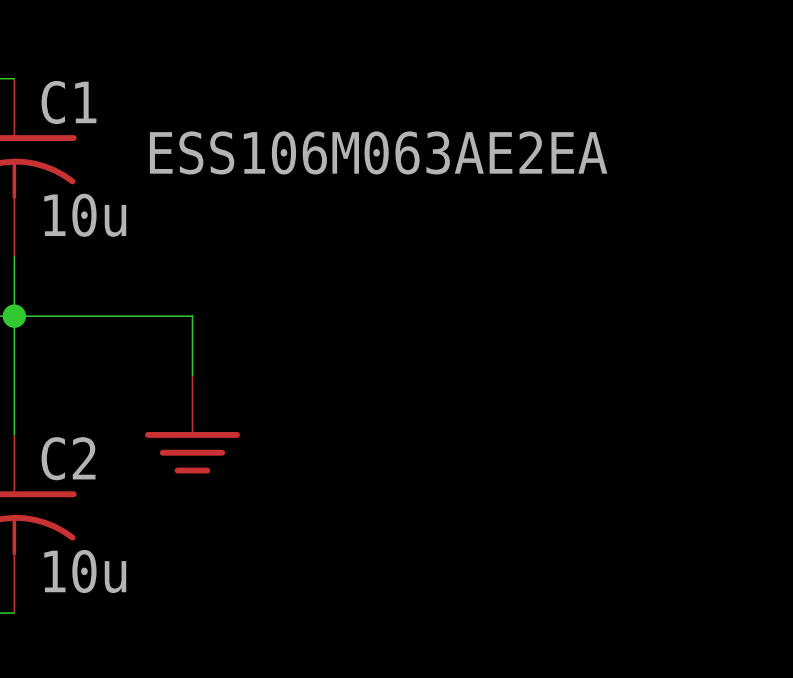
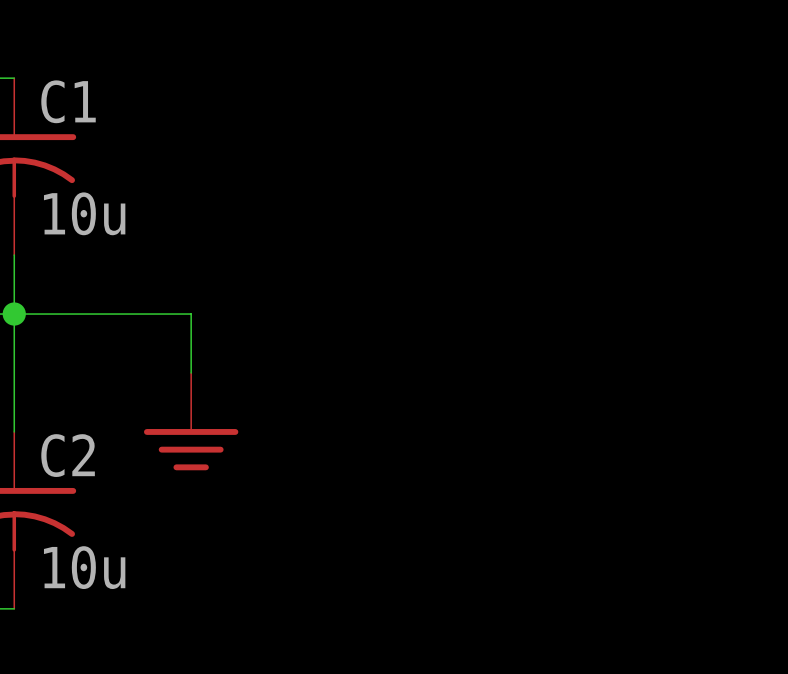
text: ESS106M063AE2EA (378, 152) -> none

